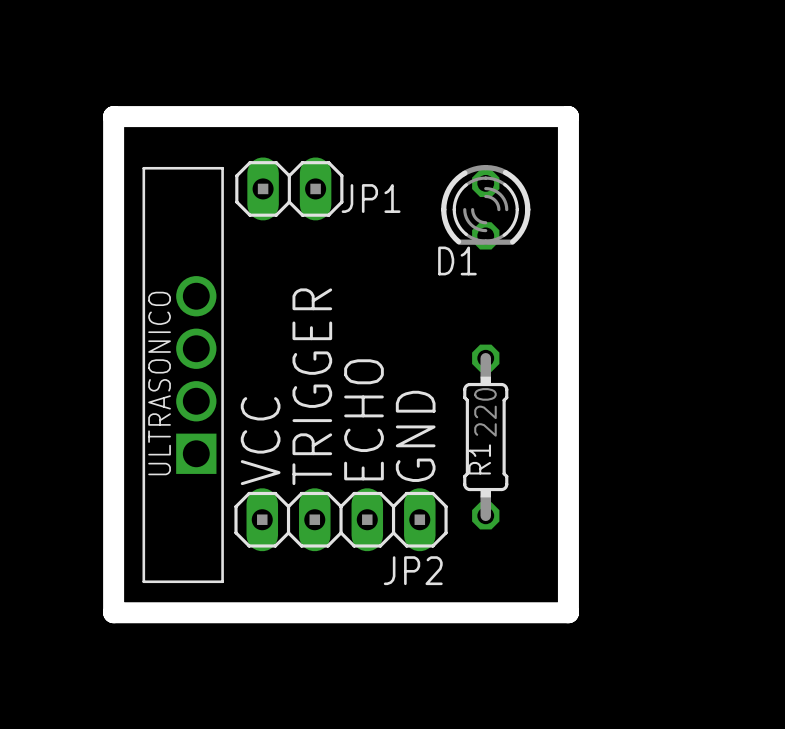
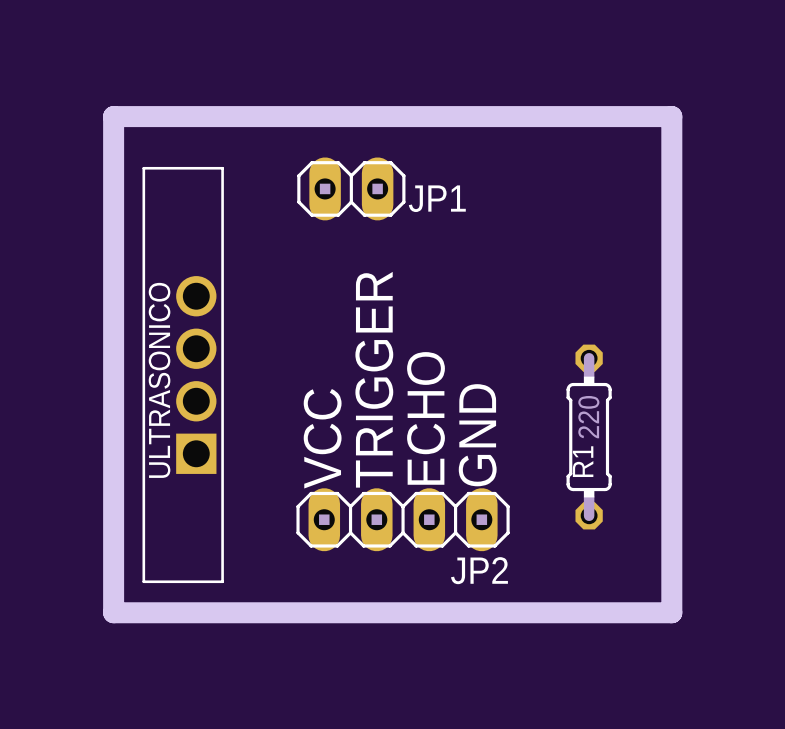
board edge: (568, 116) (568, 612) -> (568, 116) (671, 116) (671, 612) (568, 612)
JP1 position: (289, 188) -> (351, 188)
D1: (485, 207) -> none
text position: TRIGGER (312, 386) -> TRIGGER (374, 379)
text position: ECHO (364, 419) -> ECHO (426, 418)
text position: GND (415, 436) -> GND (477, 435)
R1 position: (485, 437) -> (589, 437)
text position: VCC (260, 441) -> VCC (322, 438)
JP2 position: (341, 519) -> (403, 519)

